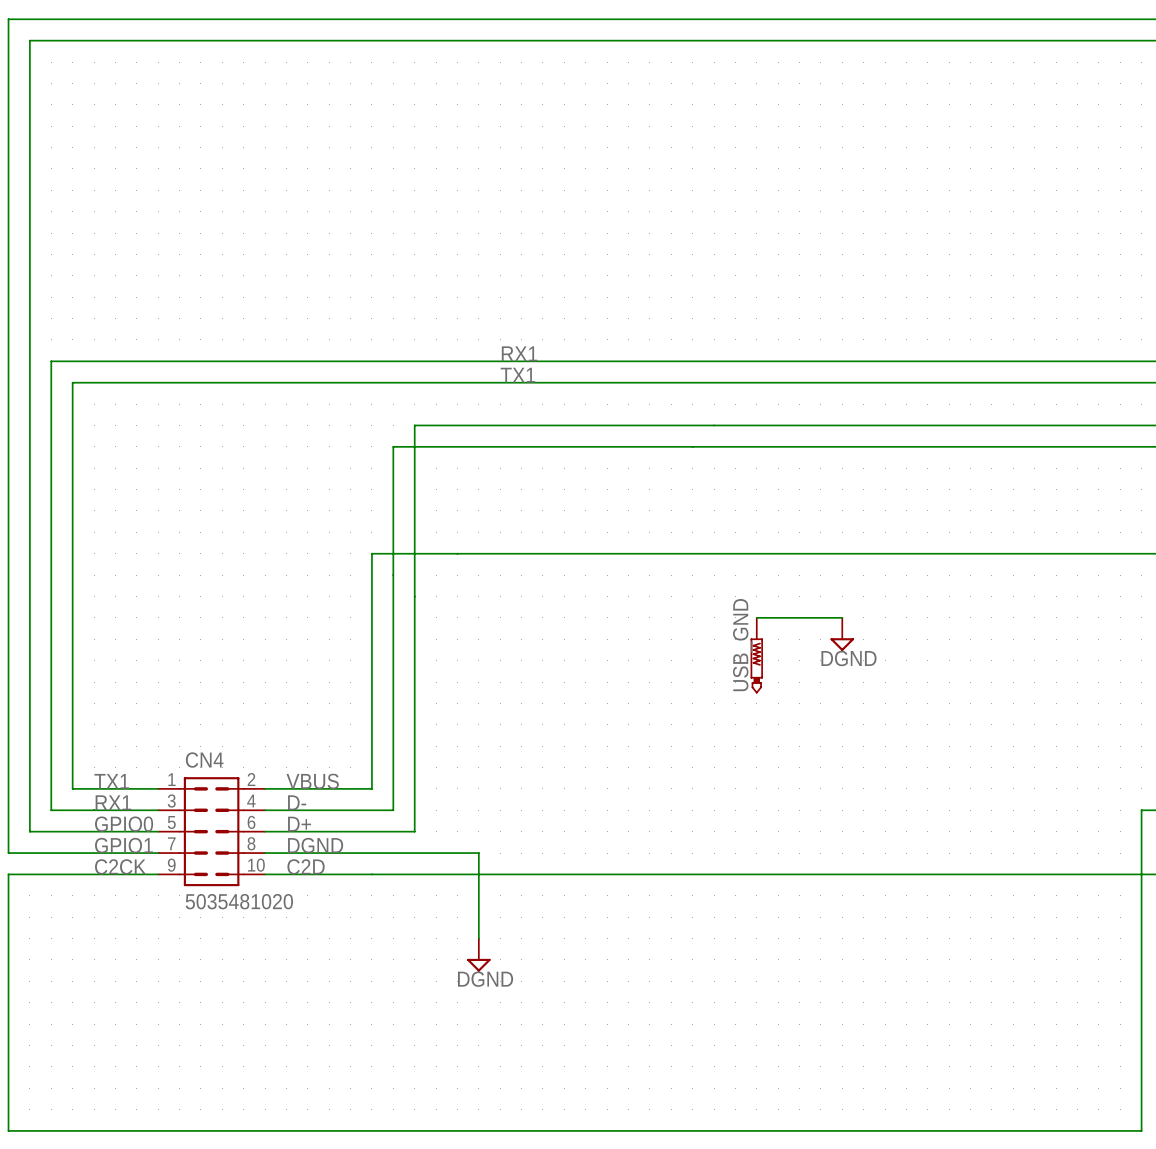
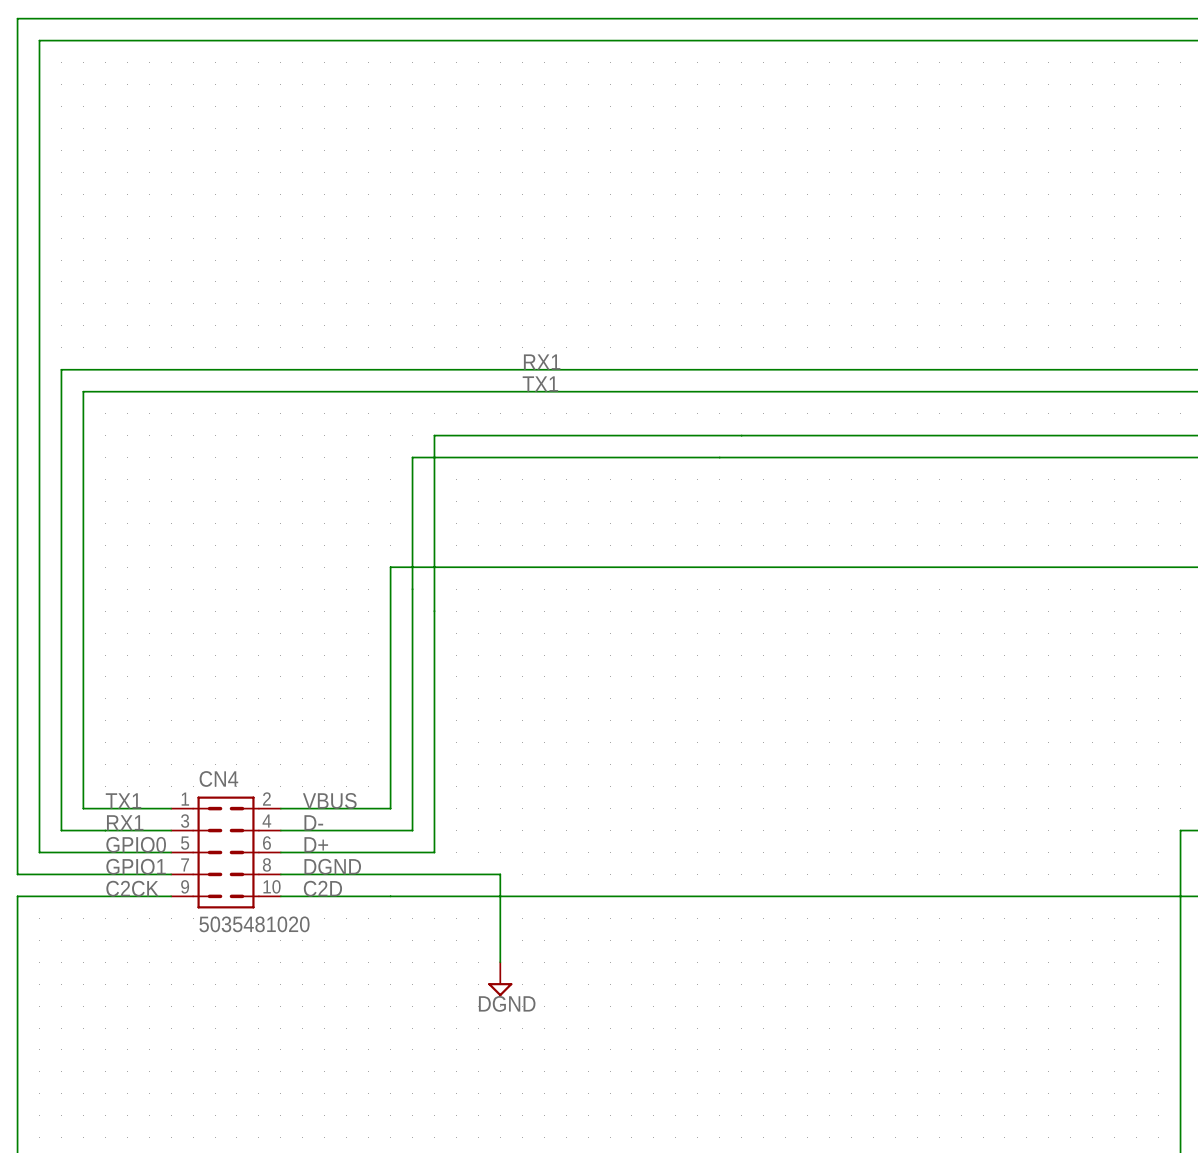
wire: (756, 617) (842, 617) -> none
power symbol: DGND (842, 634) -> none
USB_GND: (756, 655) -> none

